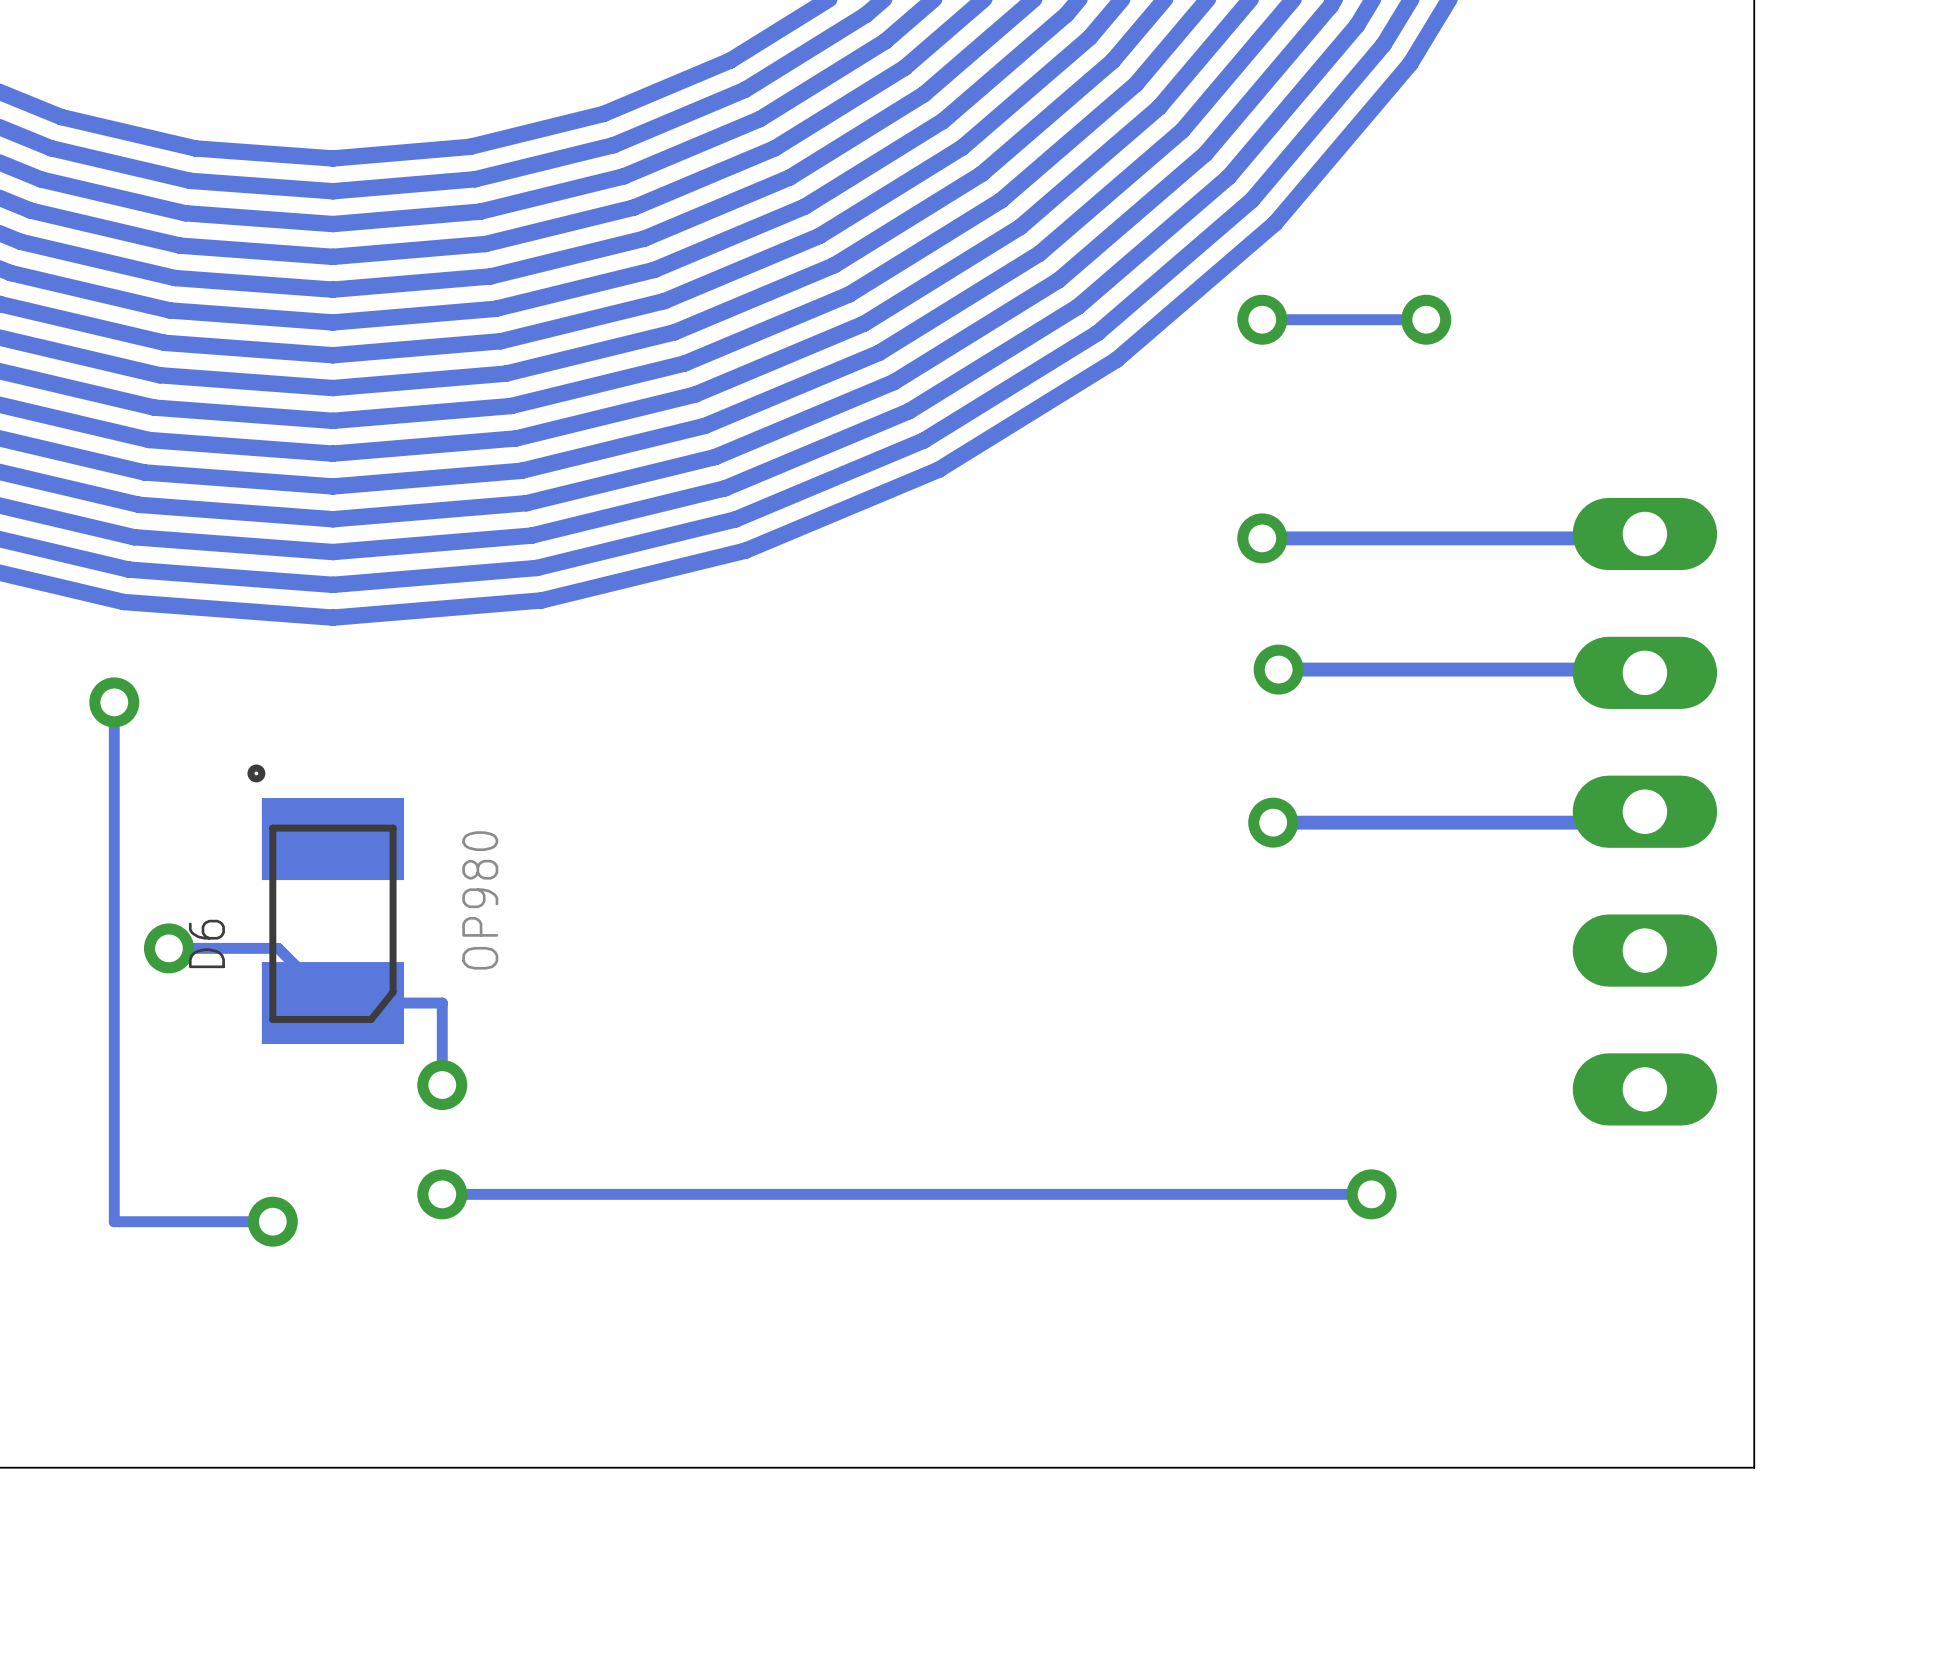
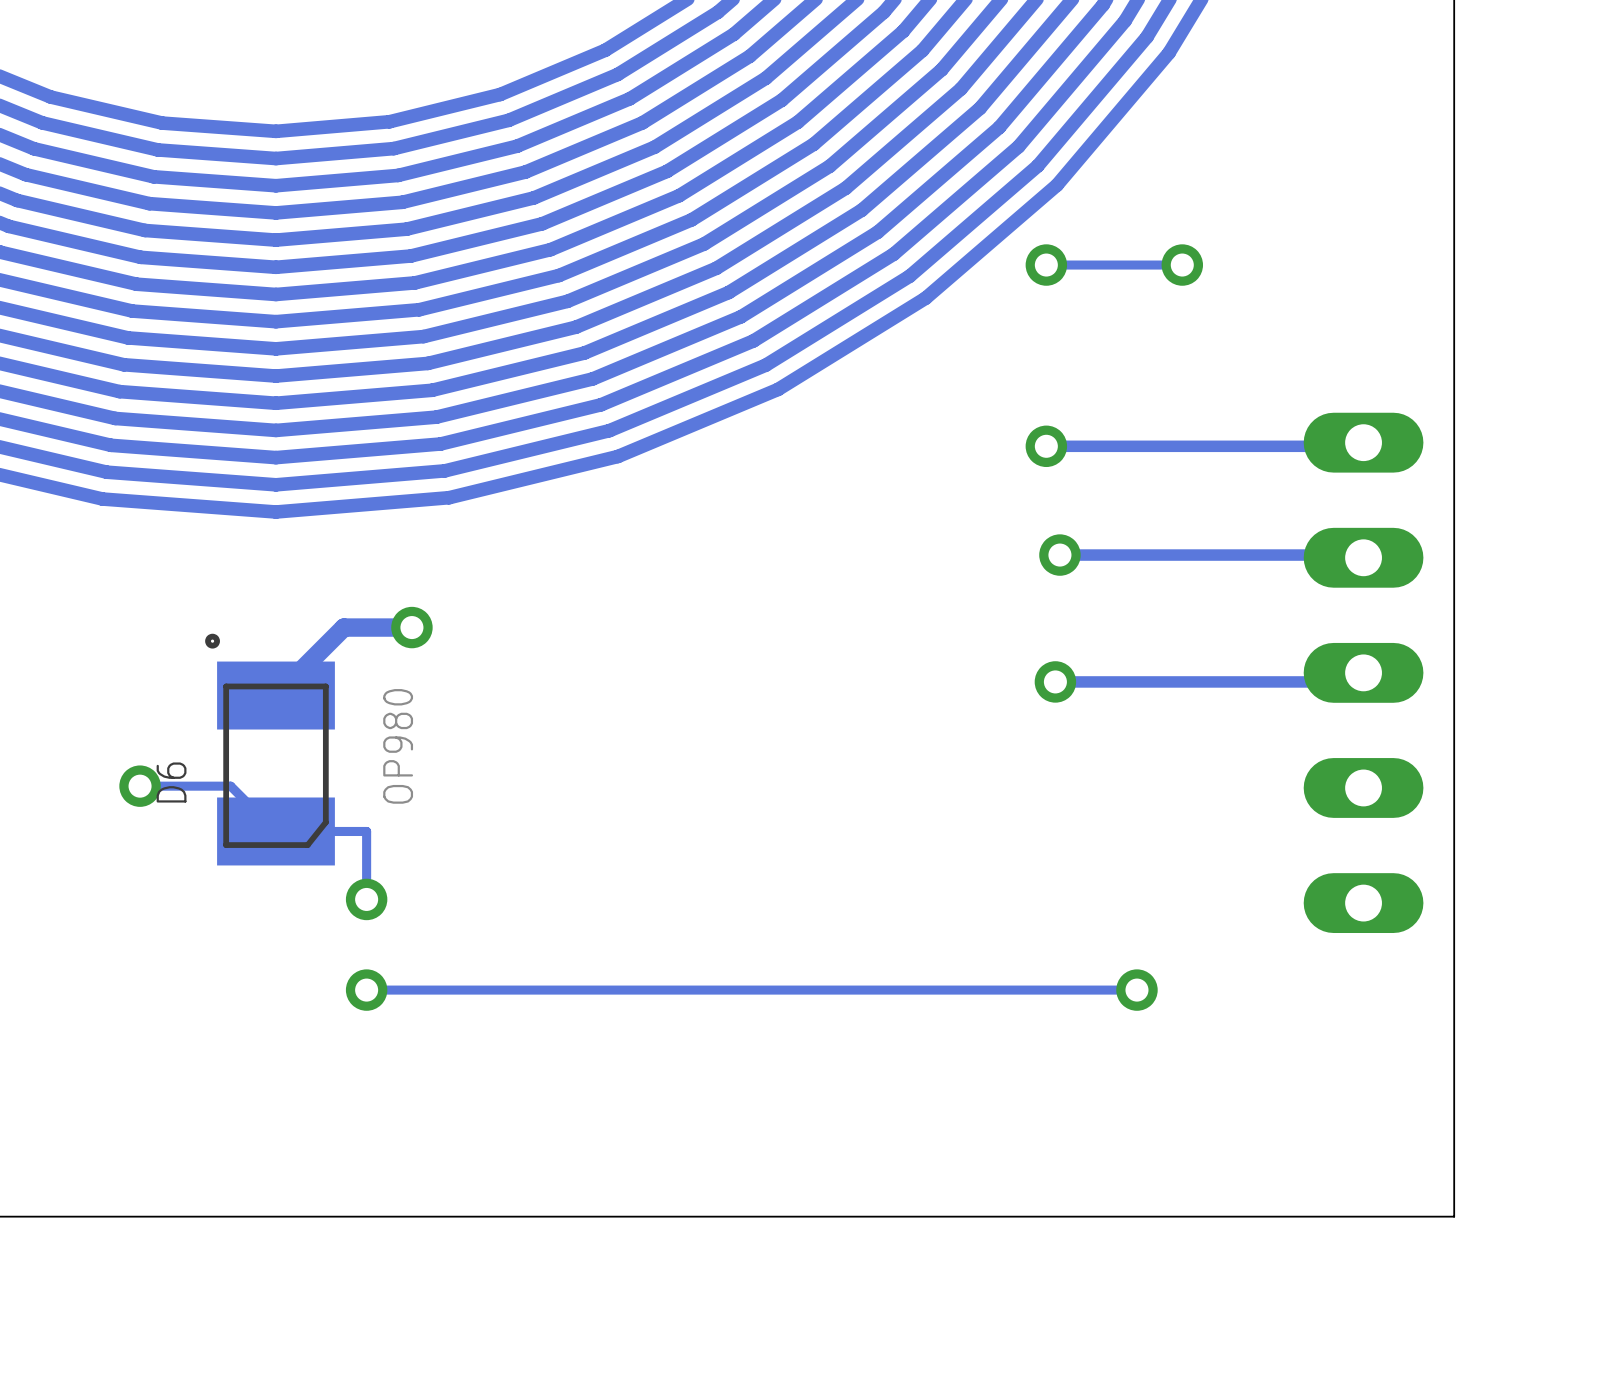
track: (114, 702) (114, 1221) (272, 1221) -> none
via: (114, 702) -> none
track: none -> (411, 627) (343, 627) (275, 695)
via: none -> (411, 627)
via: (272, 1221) -> none

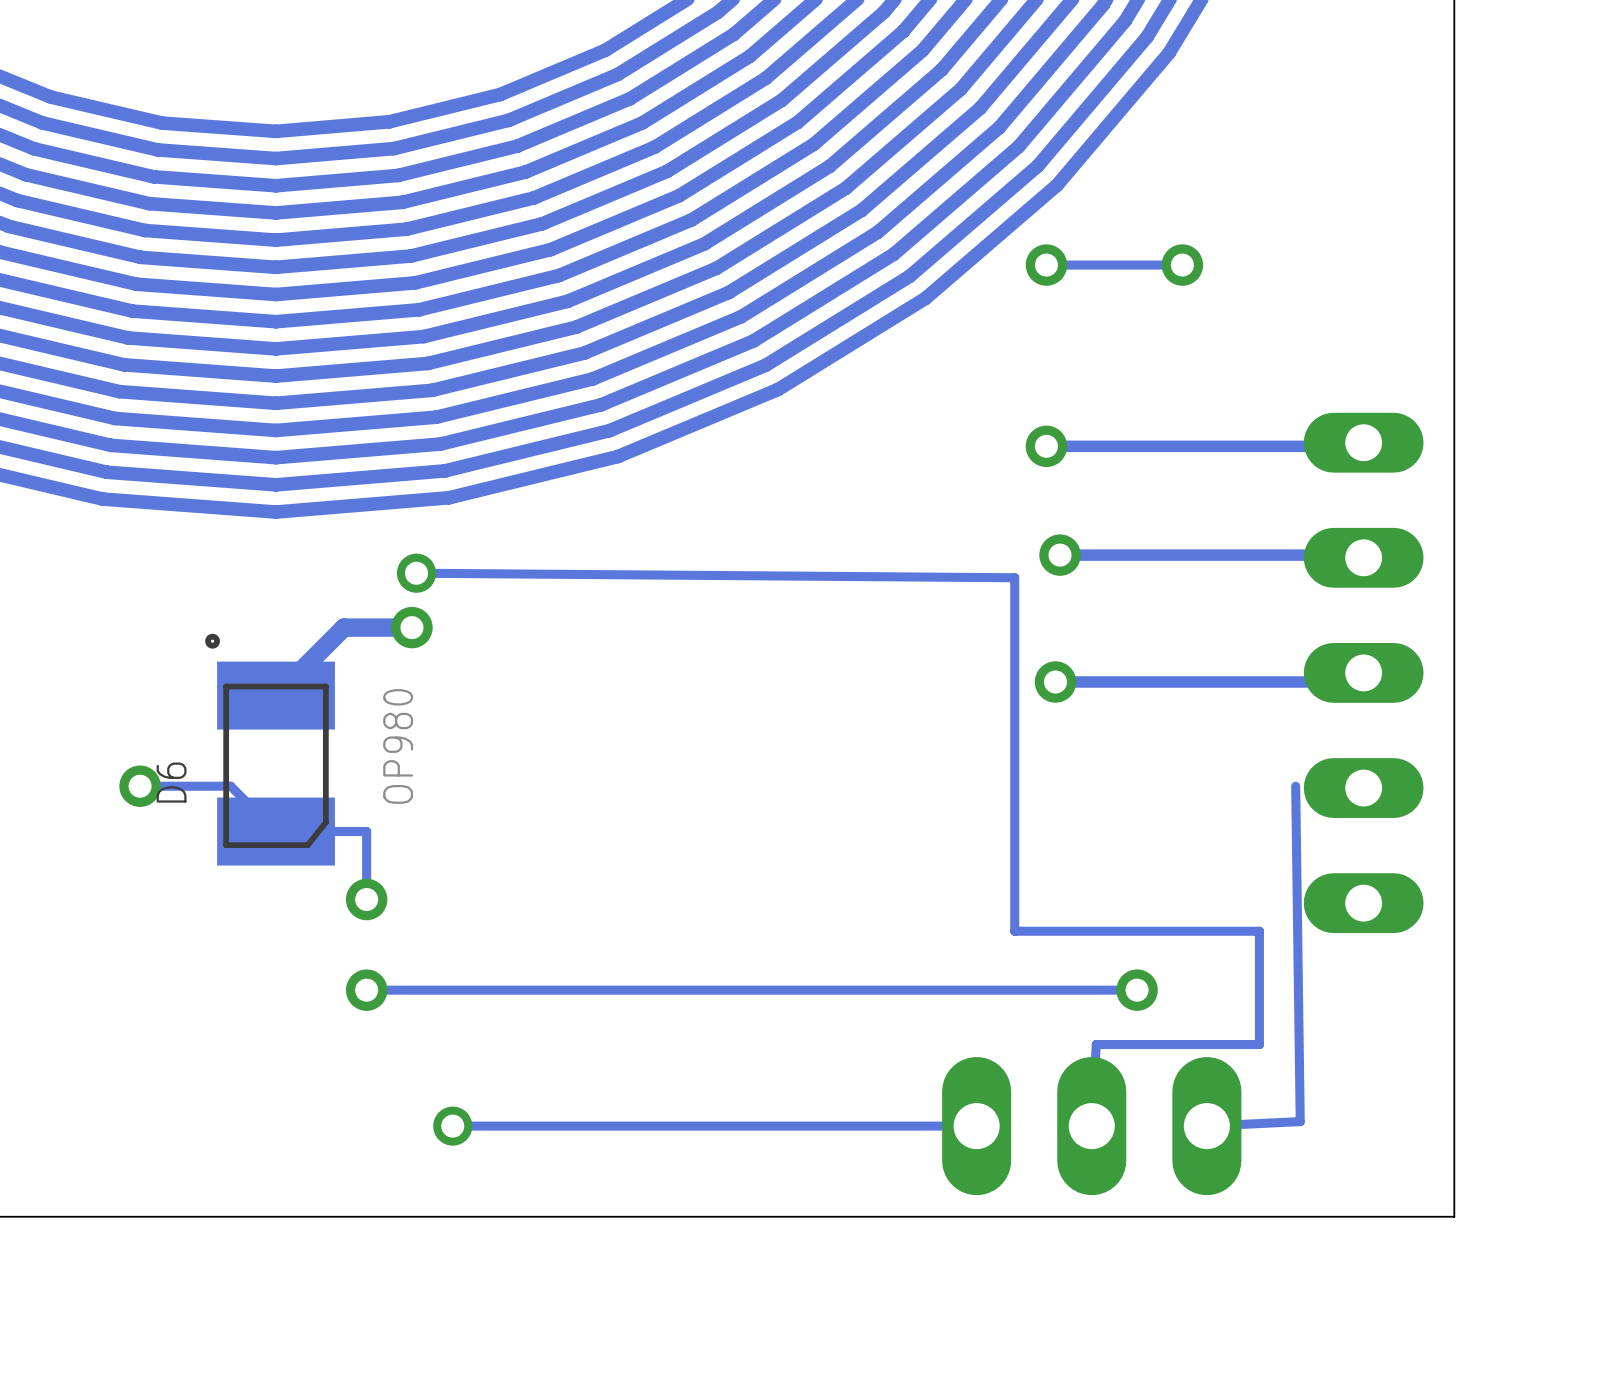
track: none -> (416, 573) (1014, 577) (1014, 931) (1259, 931) (1259, 1044) (1096, 1044) (1091, 1126)
via: none -> (416, 573)
track: none -> (1295, 786) (1300, 1121) (1206, 1126)
via: none -> (452, 1126)
track: none -> (976, 1126) (452, 1126)
part: none -> (1091, 1126)

